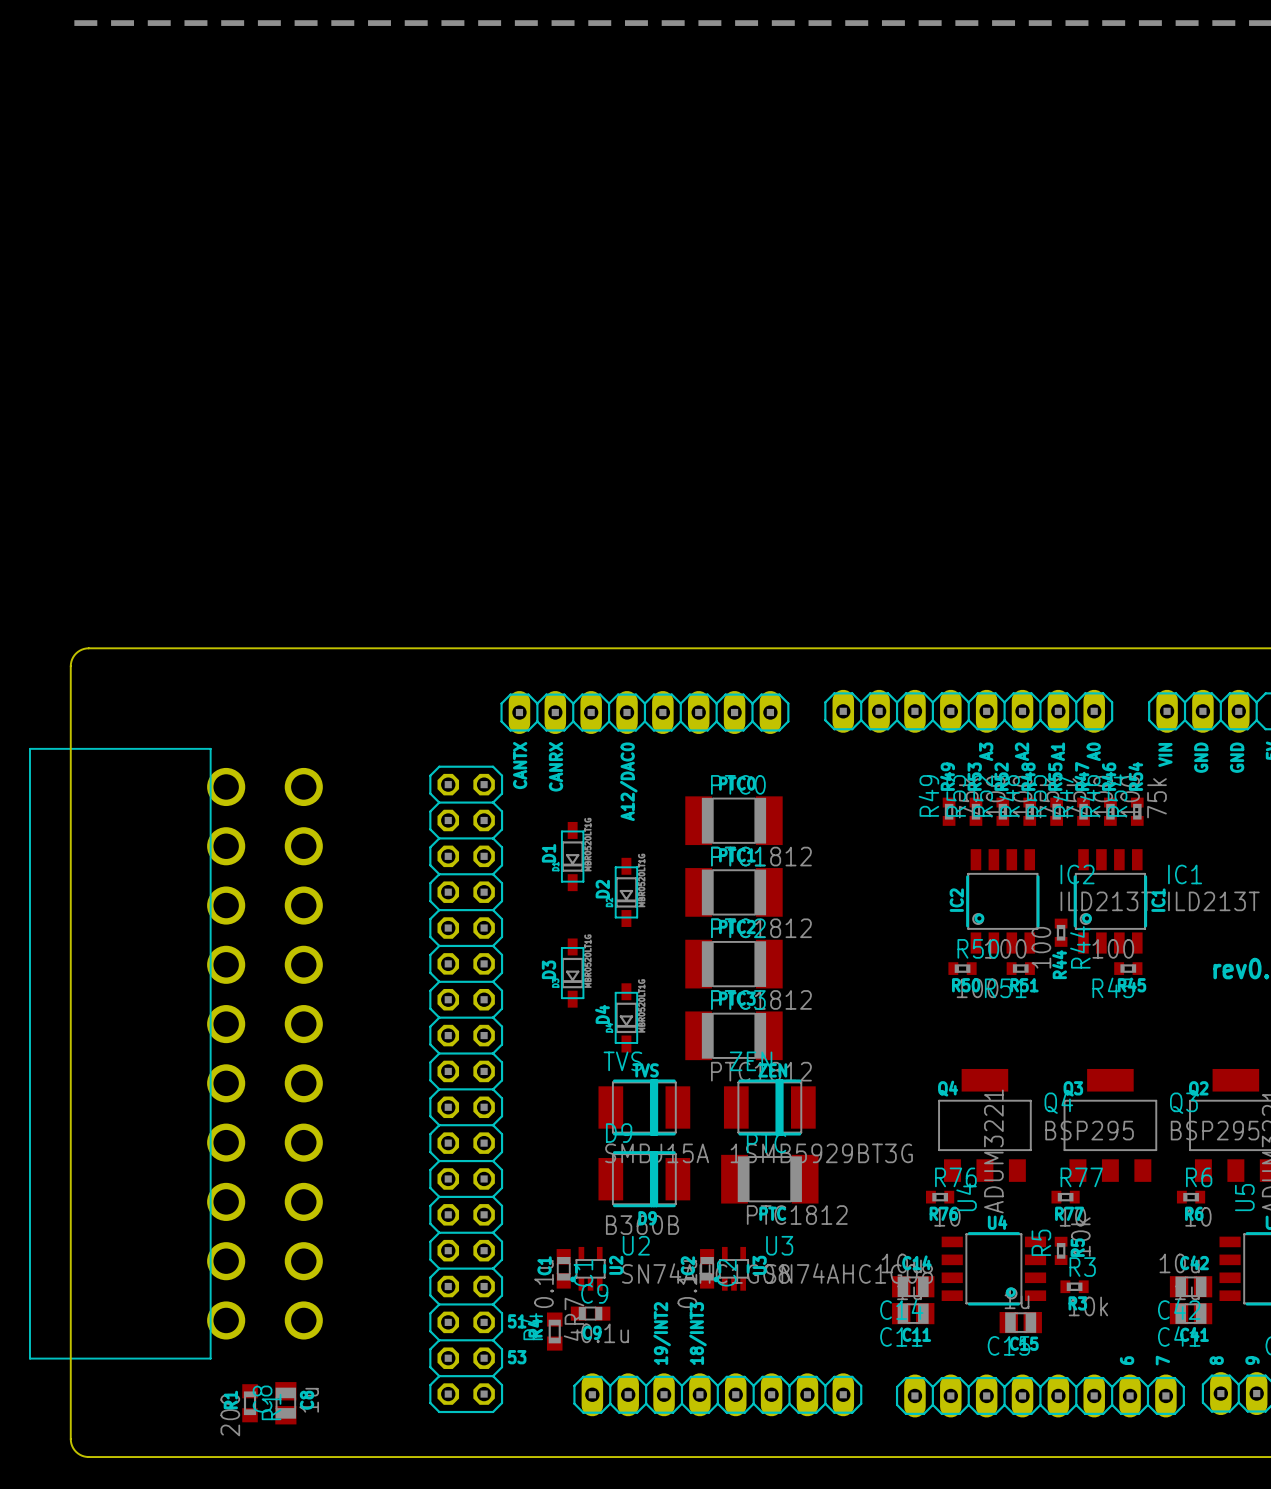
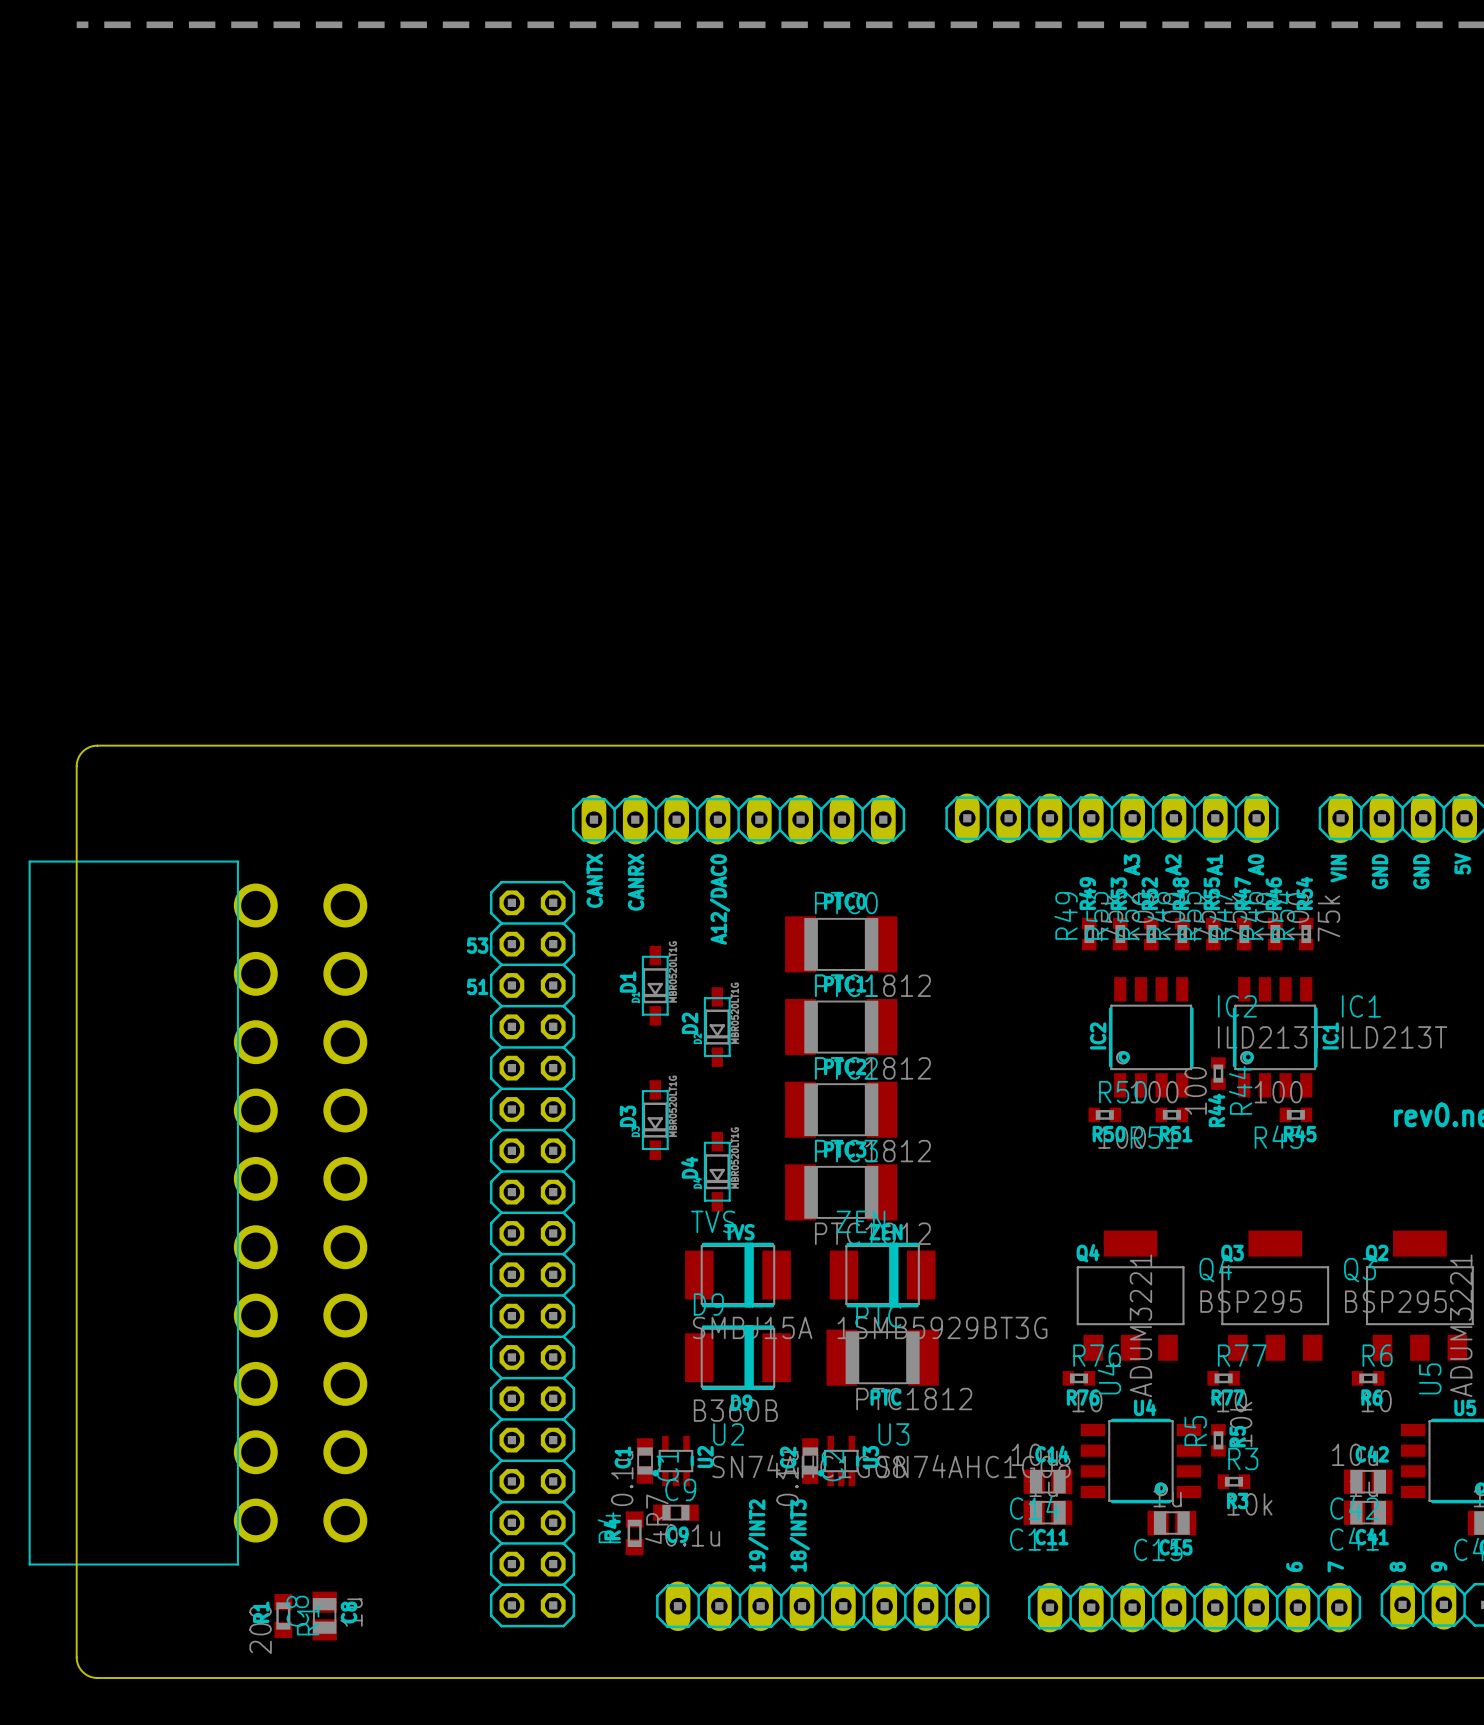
text: none -> 53 (477, 945)
text: none -> 51 (477, 986)
text: 51 (517, 1321) -> none
text: 53 (517, 1357) -> none

